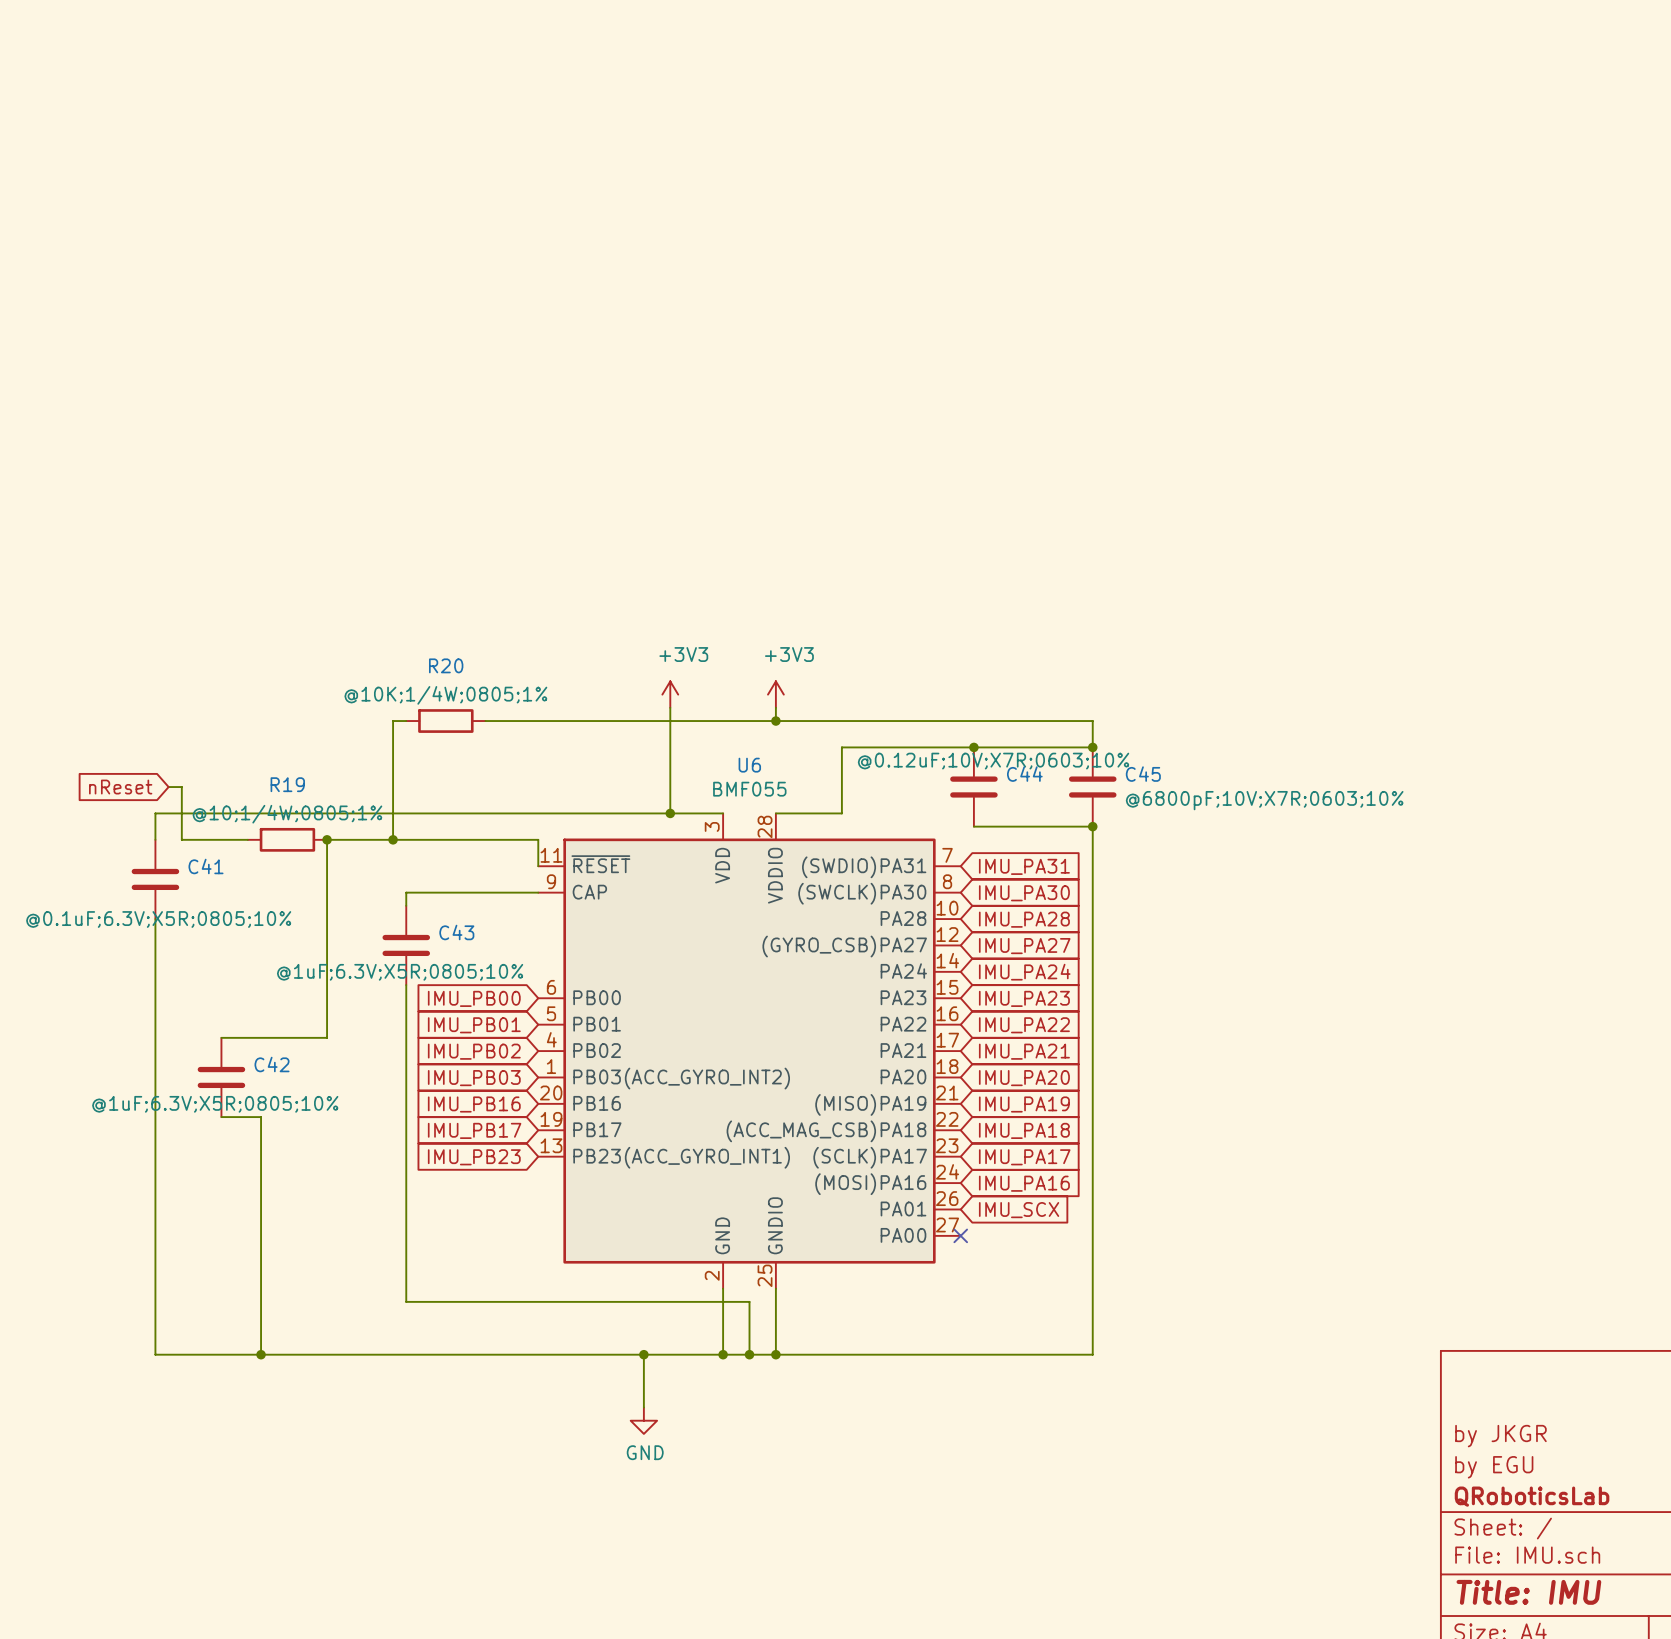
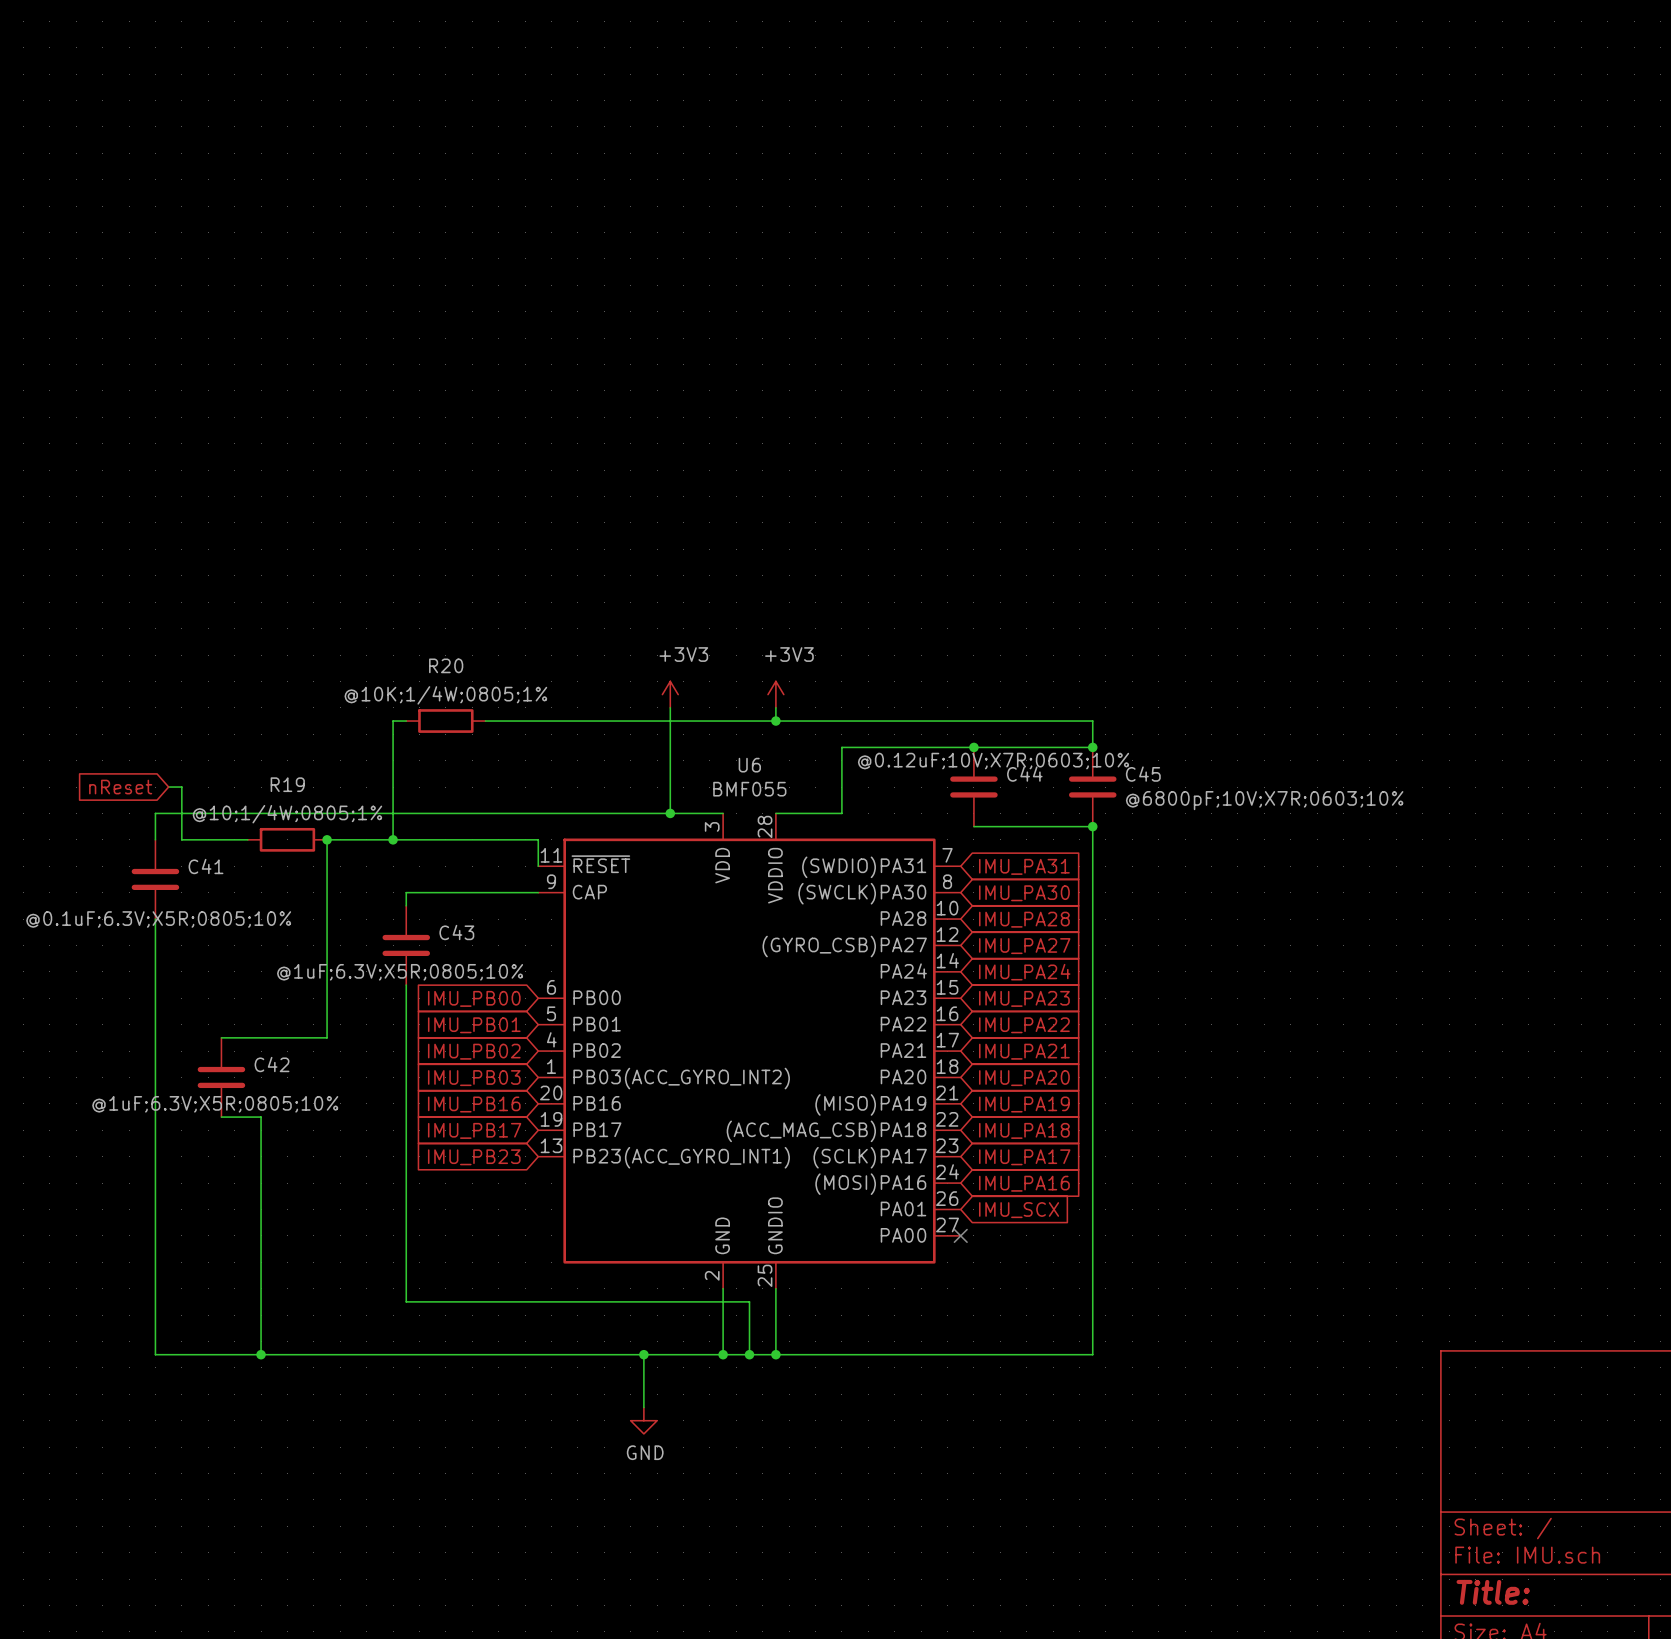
title block: by JKGR (1500, 1436) -> none
title block: by EGU (1494, 1467) -> none
title block: QRoboticsLab (1532, 1496) -> none
title block: Title: IMU (1528, 1592) -> Title: (1493, 1592)

